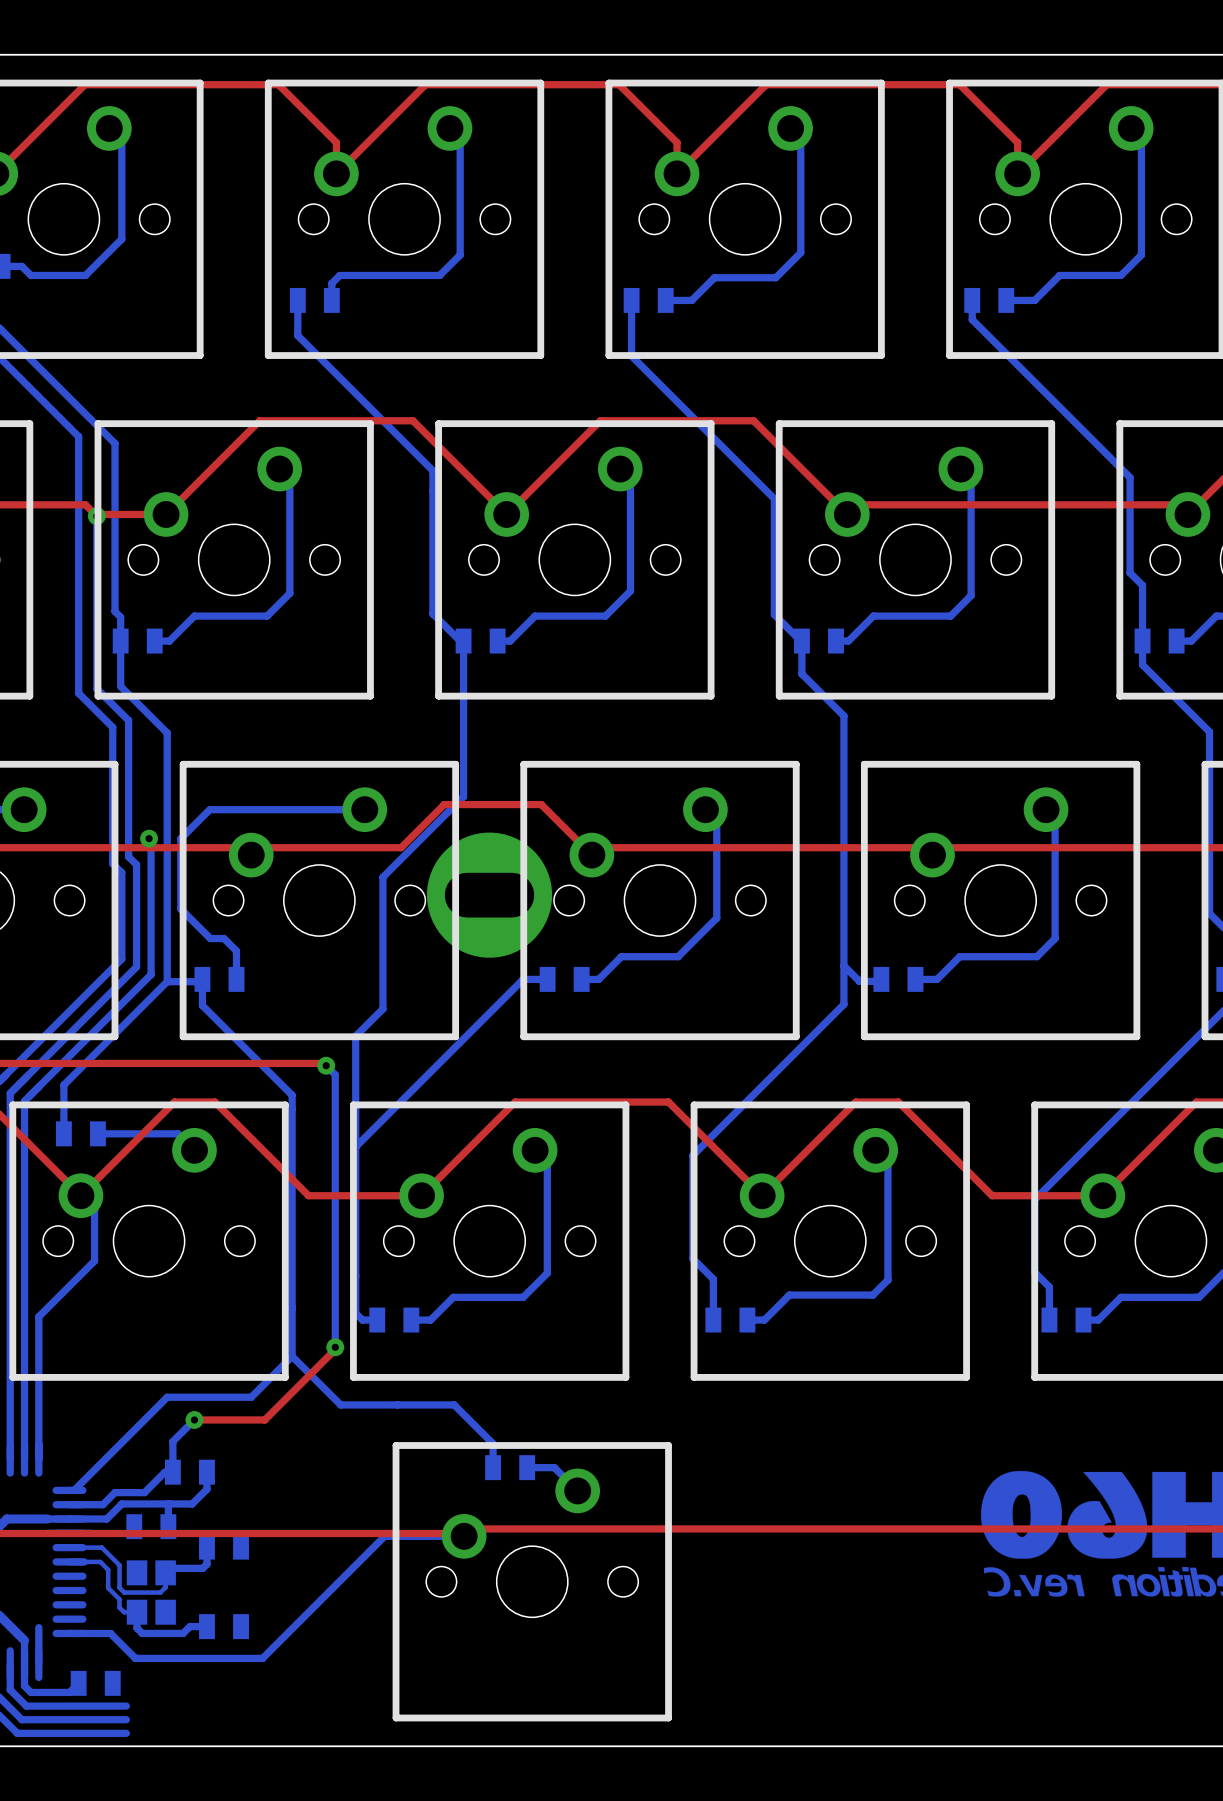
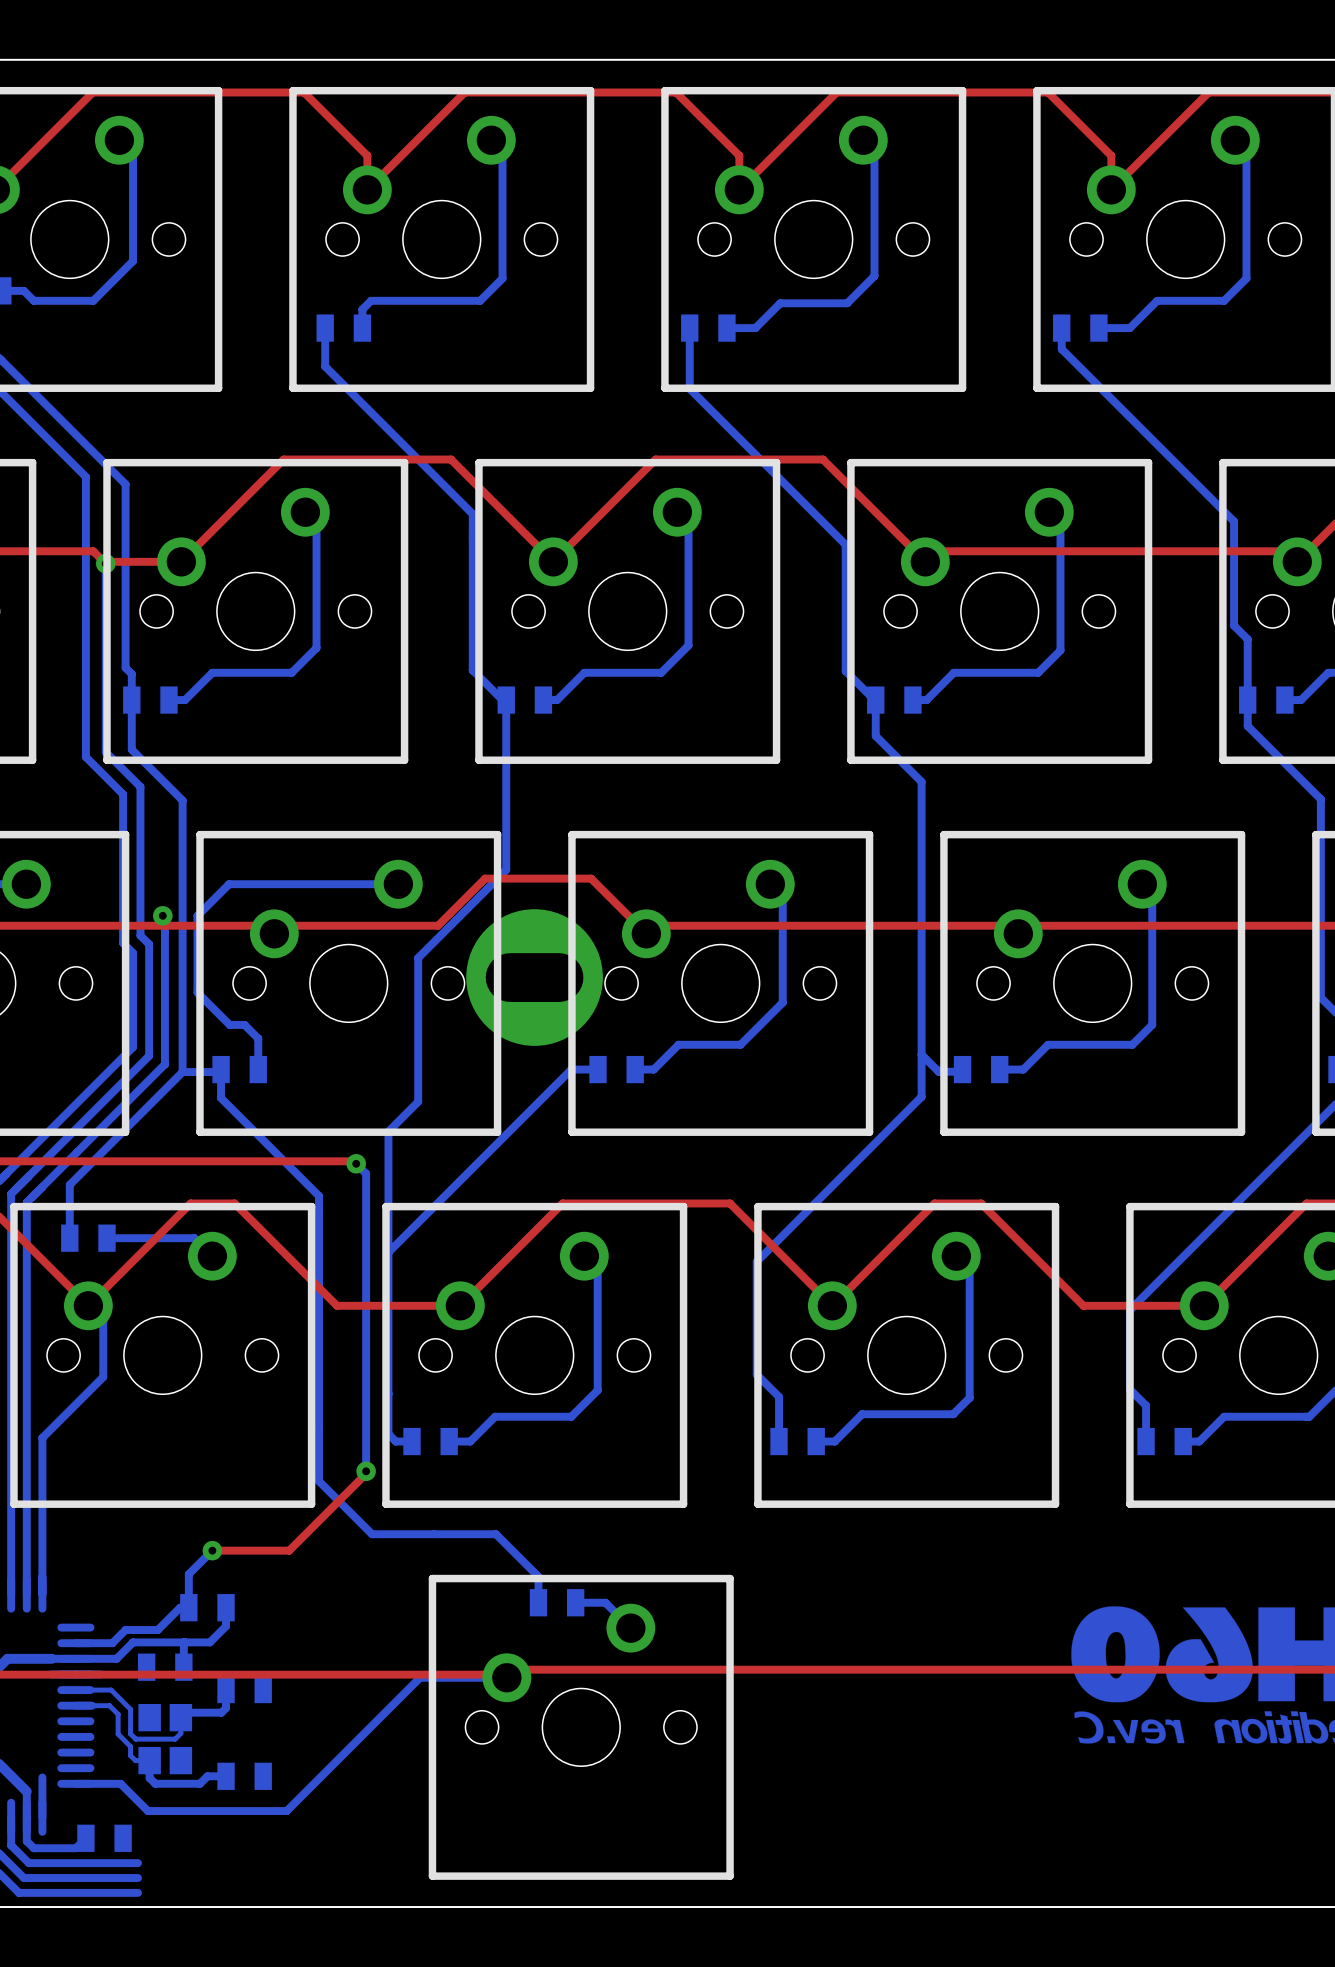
bottom track: (292, 1356) (251, 1397) (167, 1397) (74, 1490) (69, 1490) -> none

